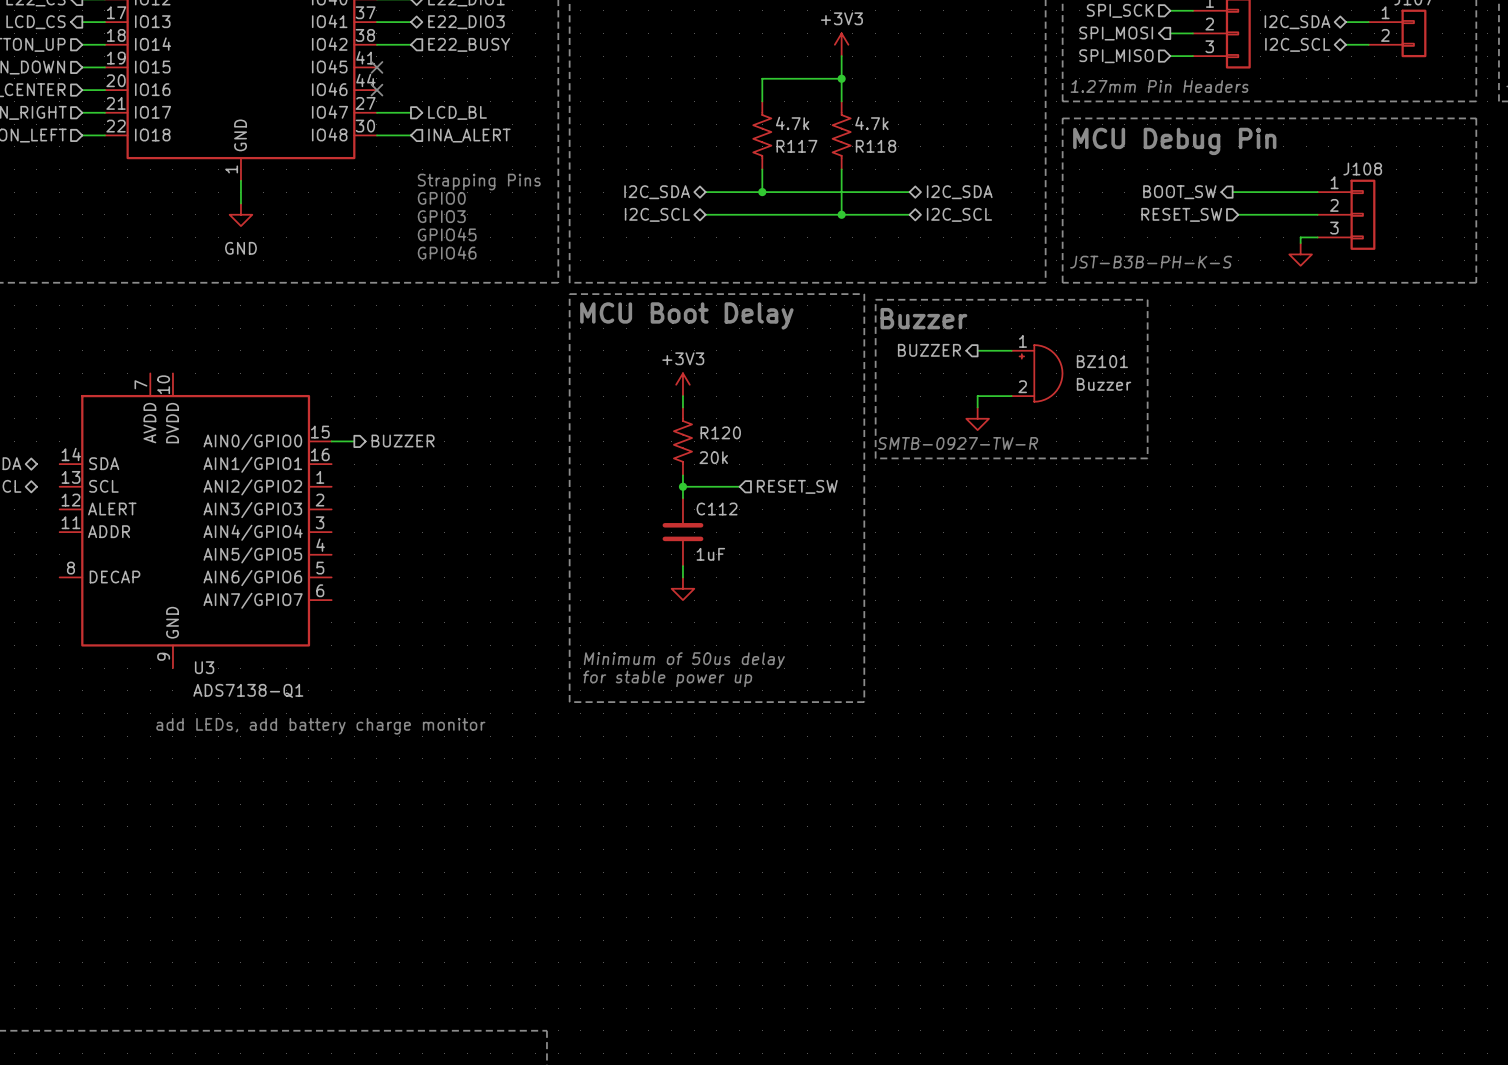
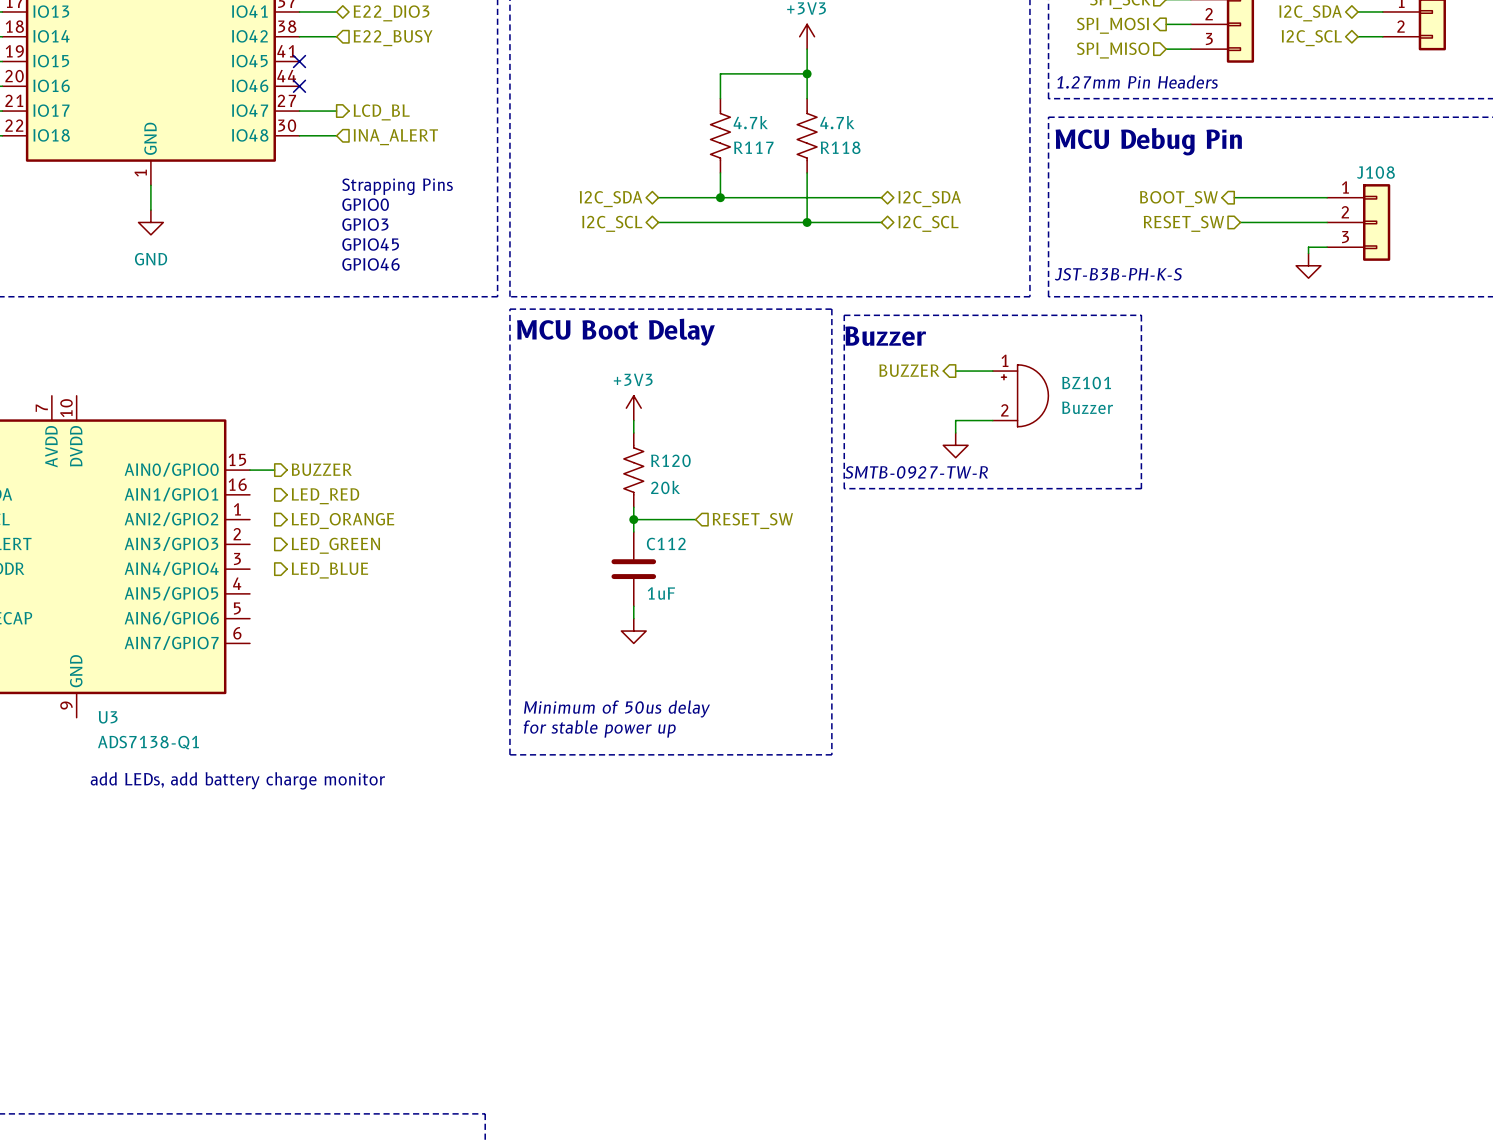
hierarchical label: none -> LED_RED (325, 496)
hierarchical label: none -> LED_ORANGE (343, 521)
hierarchical label: none -> LED_GREEN (335, 545)
hierarchical label: none -> LED_BLUE (329, 570)

